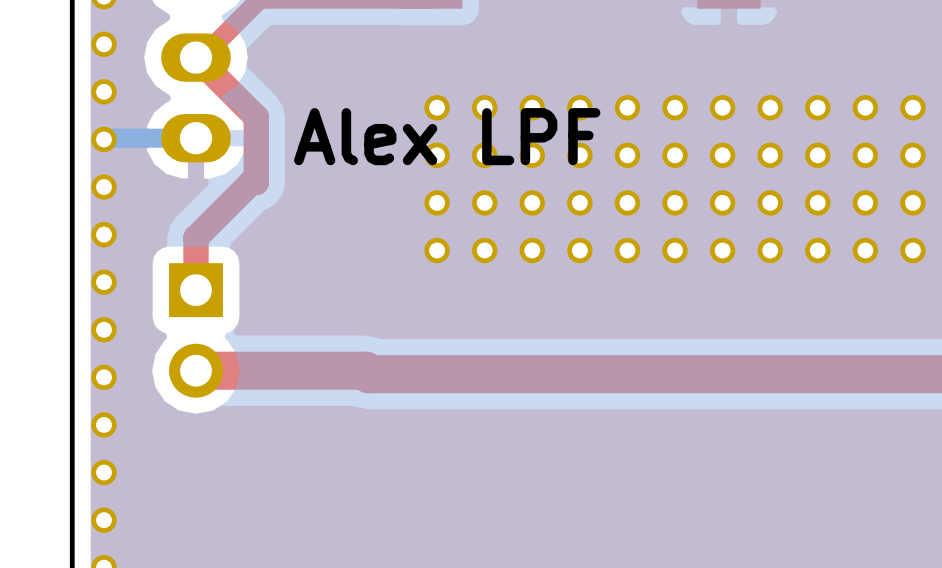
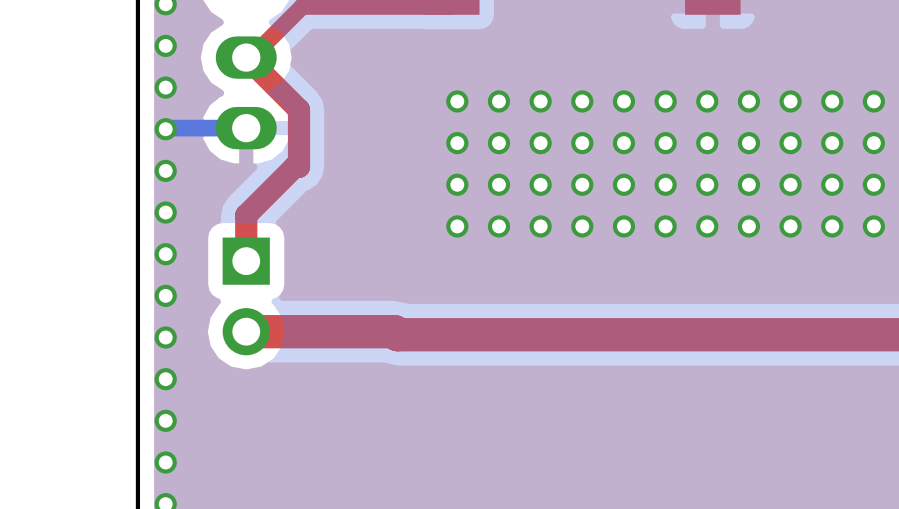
text: Alex LPF (447, 136) -> none

